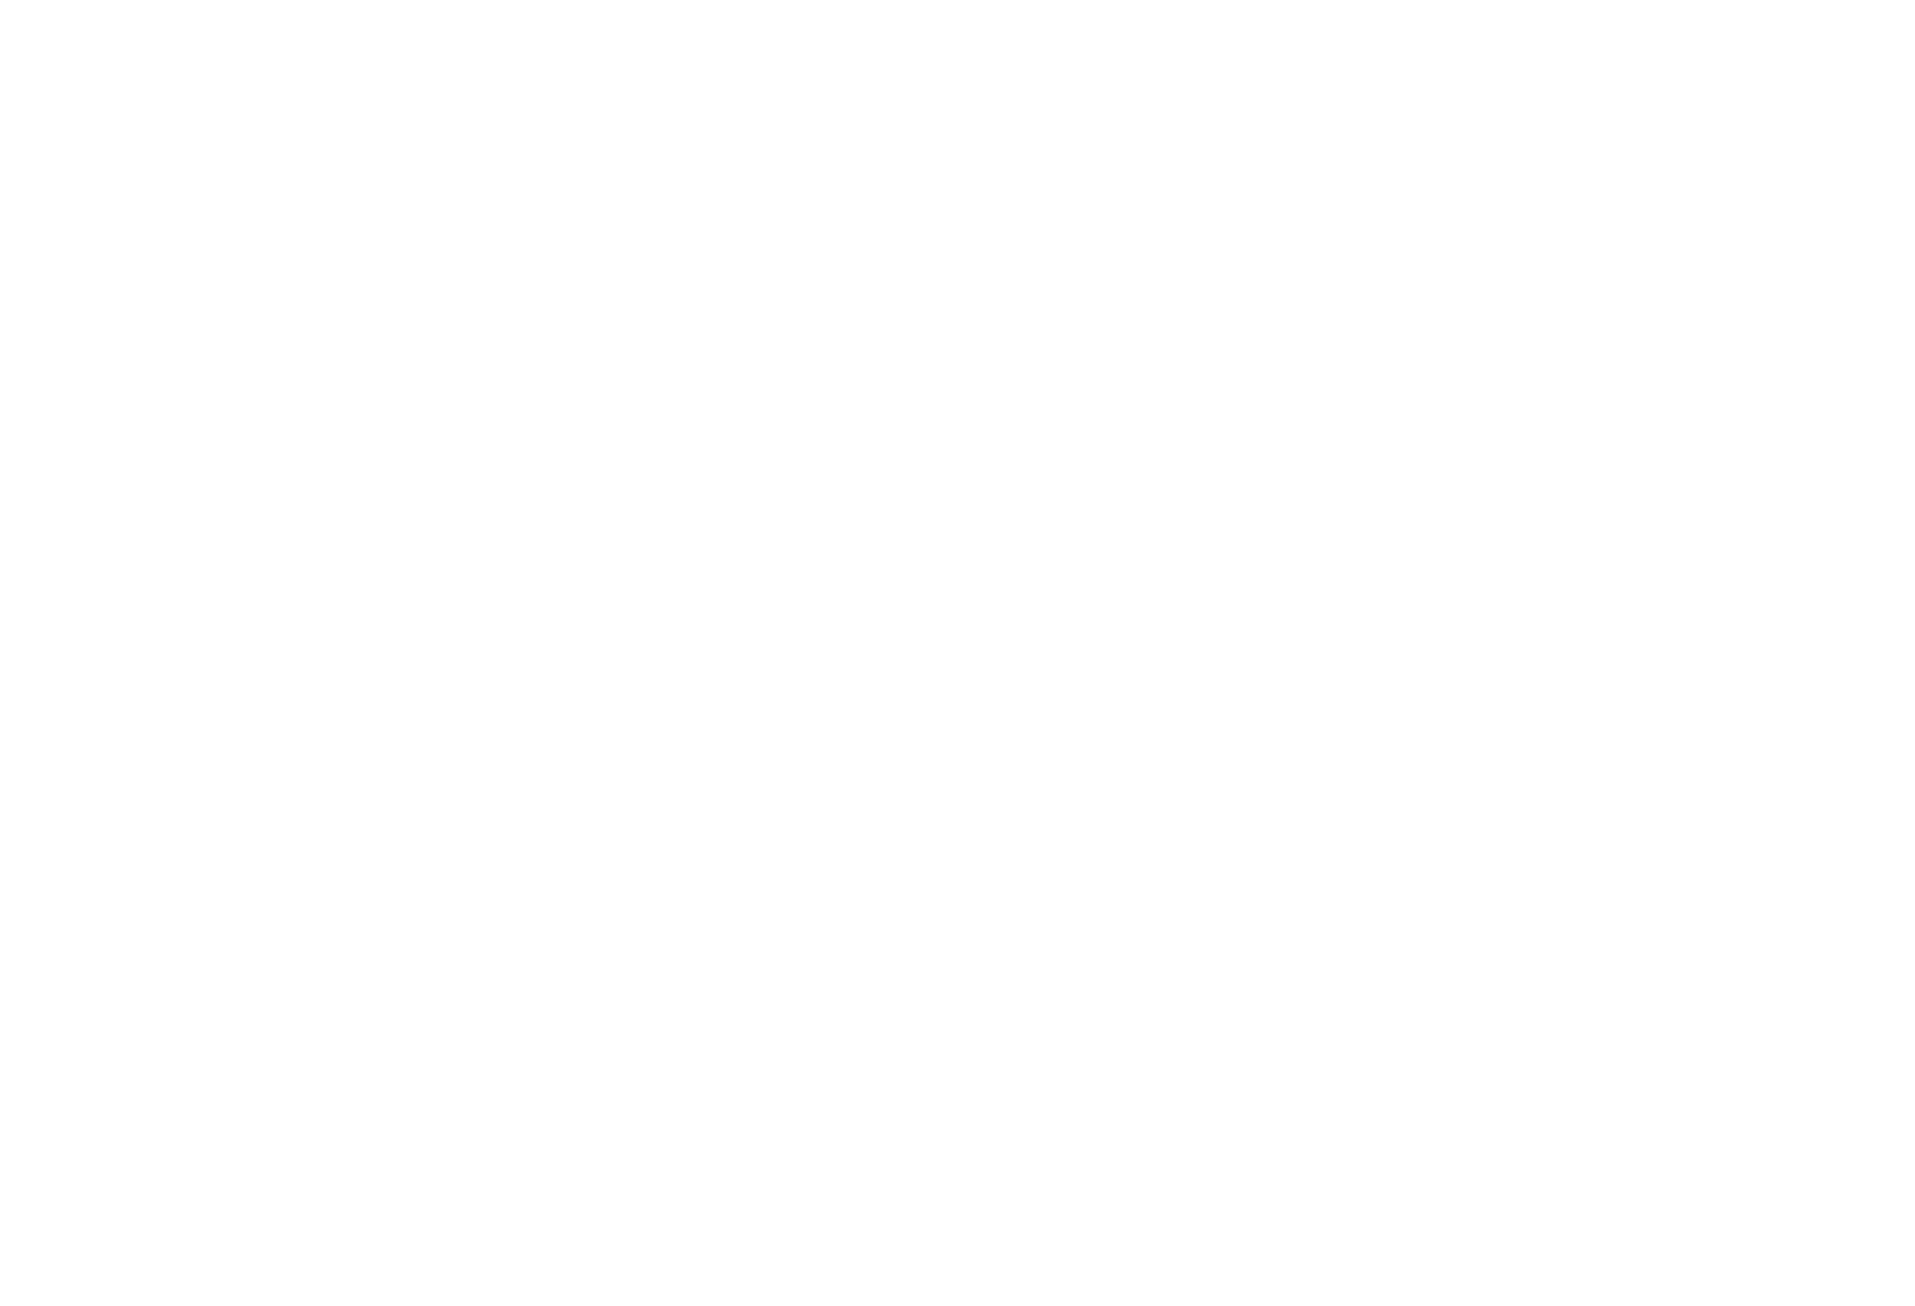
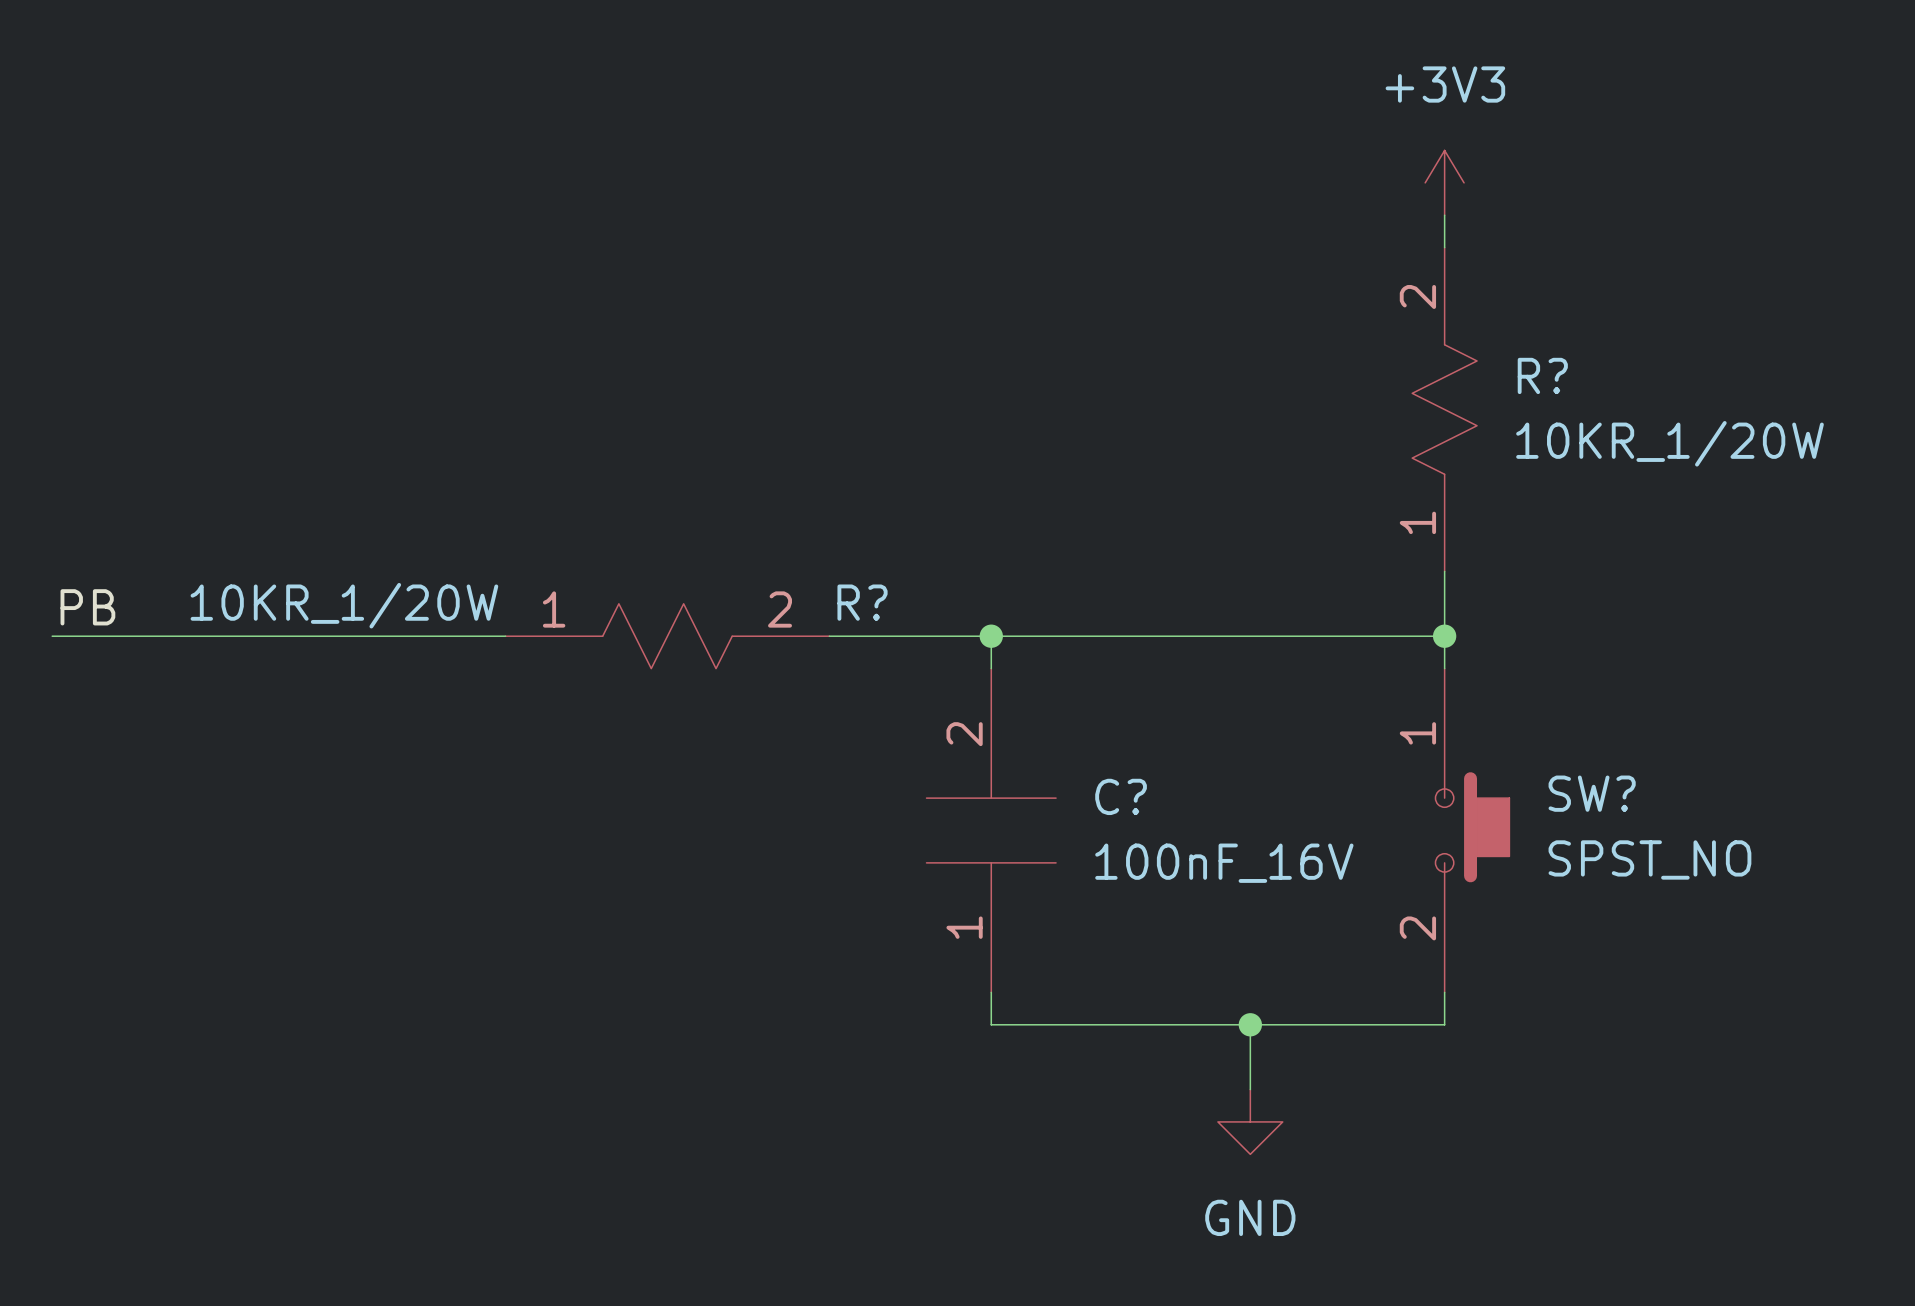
power symbol: none -> +3V3 (1444, 182)
wire: none -> (1444, 215) (1444, 247)
R?: none -> 10KR_1/20W (1444, 409)
wire: none -> (1444, 571) (1444, 668)
label: none -> PB (87, 607)
wire: none -> (52, 636) (505, 636)
R?: none -> 10KR_1/20W (667, 636)
wire: none -> (829, 636) (1444, 636)
wire: none -> (991, 636) (991, 668)
junction: none -> (991, 636)
junction: none -> (1444, 636)
C?: none -> 100nF_16V (991, 830)
SW?: none -> SPST_NO (1472, 830)
wire: none -> (991, 992) (991, 1024) (1444, 1024) (1444, 992)
wire: none -> (1250, 1024) (1250, 1089)
junction: none -> (1250, 1024)
power symbol: none -> GND (1250, 1121)

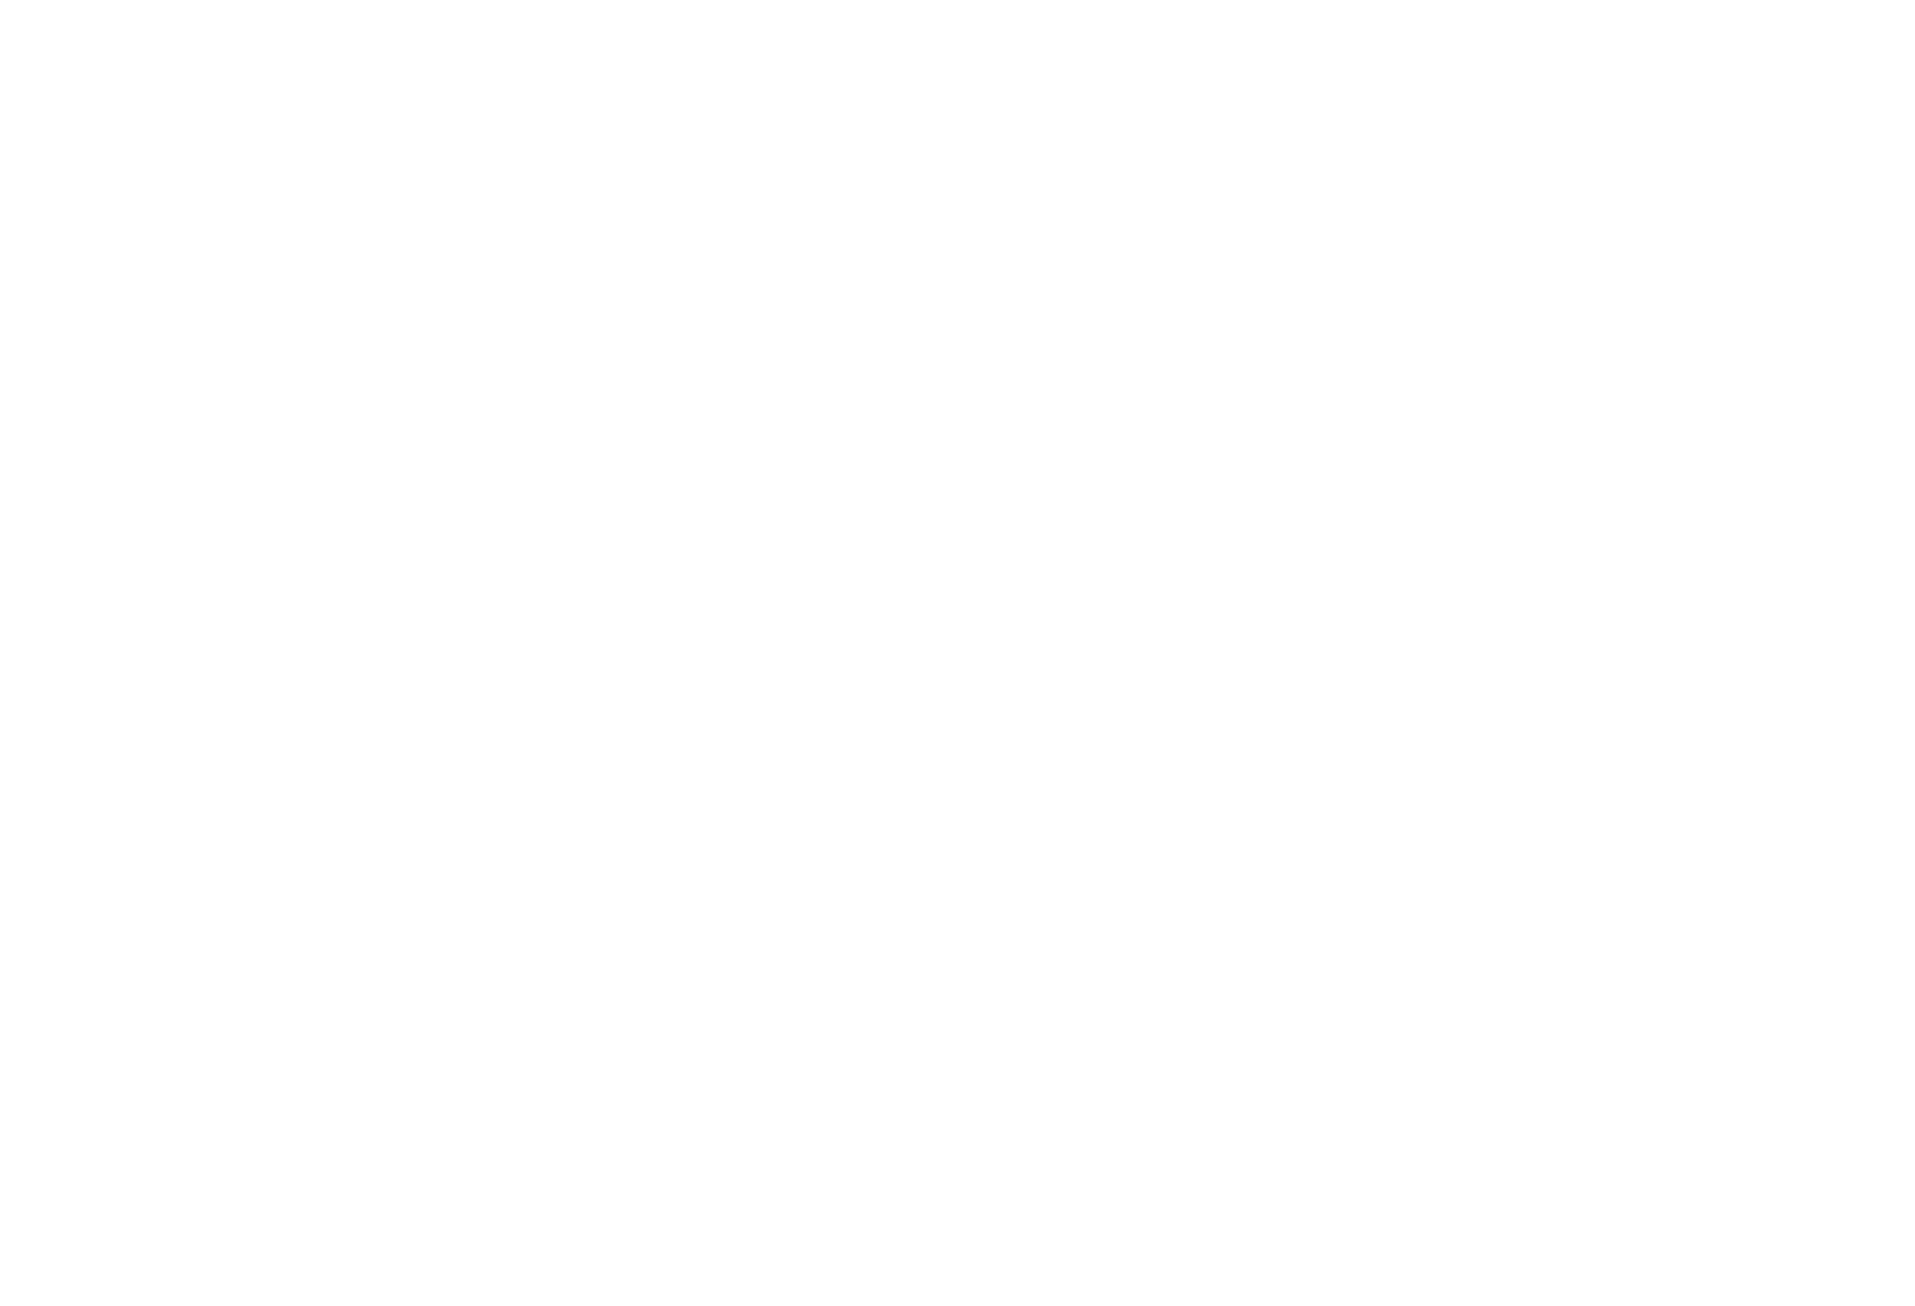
power symbol: +3V3 (1444, 182) -> none
wire: (1444, 215) (1444, 247) -> none
R?: 10KR_1/20W (1444, 409) -> none
wire: (1444, 571) (1444, 668) -> none
label: PB (87, 607) -> none
wire: (52, 636) (505, 636) -> none
R?: 10KR_1/20W (667, 636) -> none
wire: (829, 636) (1444, 636) -> none
wire: (991, 636) (991, 668) -> none
junction: (991, 636) -> none
junction: (1444, 636) -> none
C?: 100nF_16V (991, 830) -> none
SW?: SPST_NO (1472, 830) -> none
wire: (991, 992) (991, 1024) (1444, 1024) (1444, 992) -> none
wire: (1250, 1024) (1250, 1089) -> none
junction: (1250, 1024) -> none
power symbol: GND (1250, 1121) -> none

